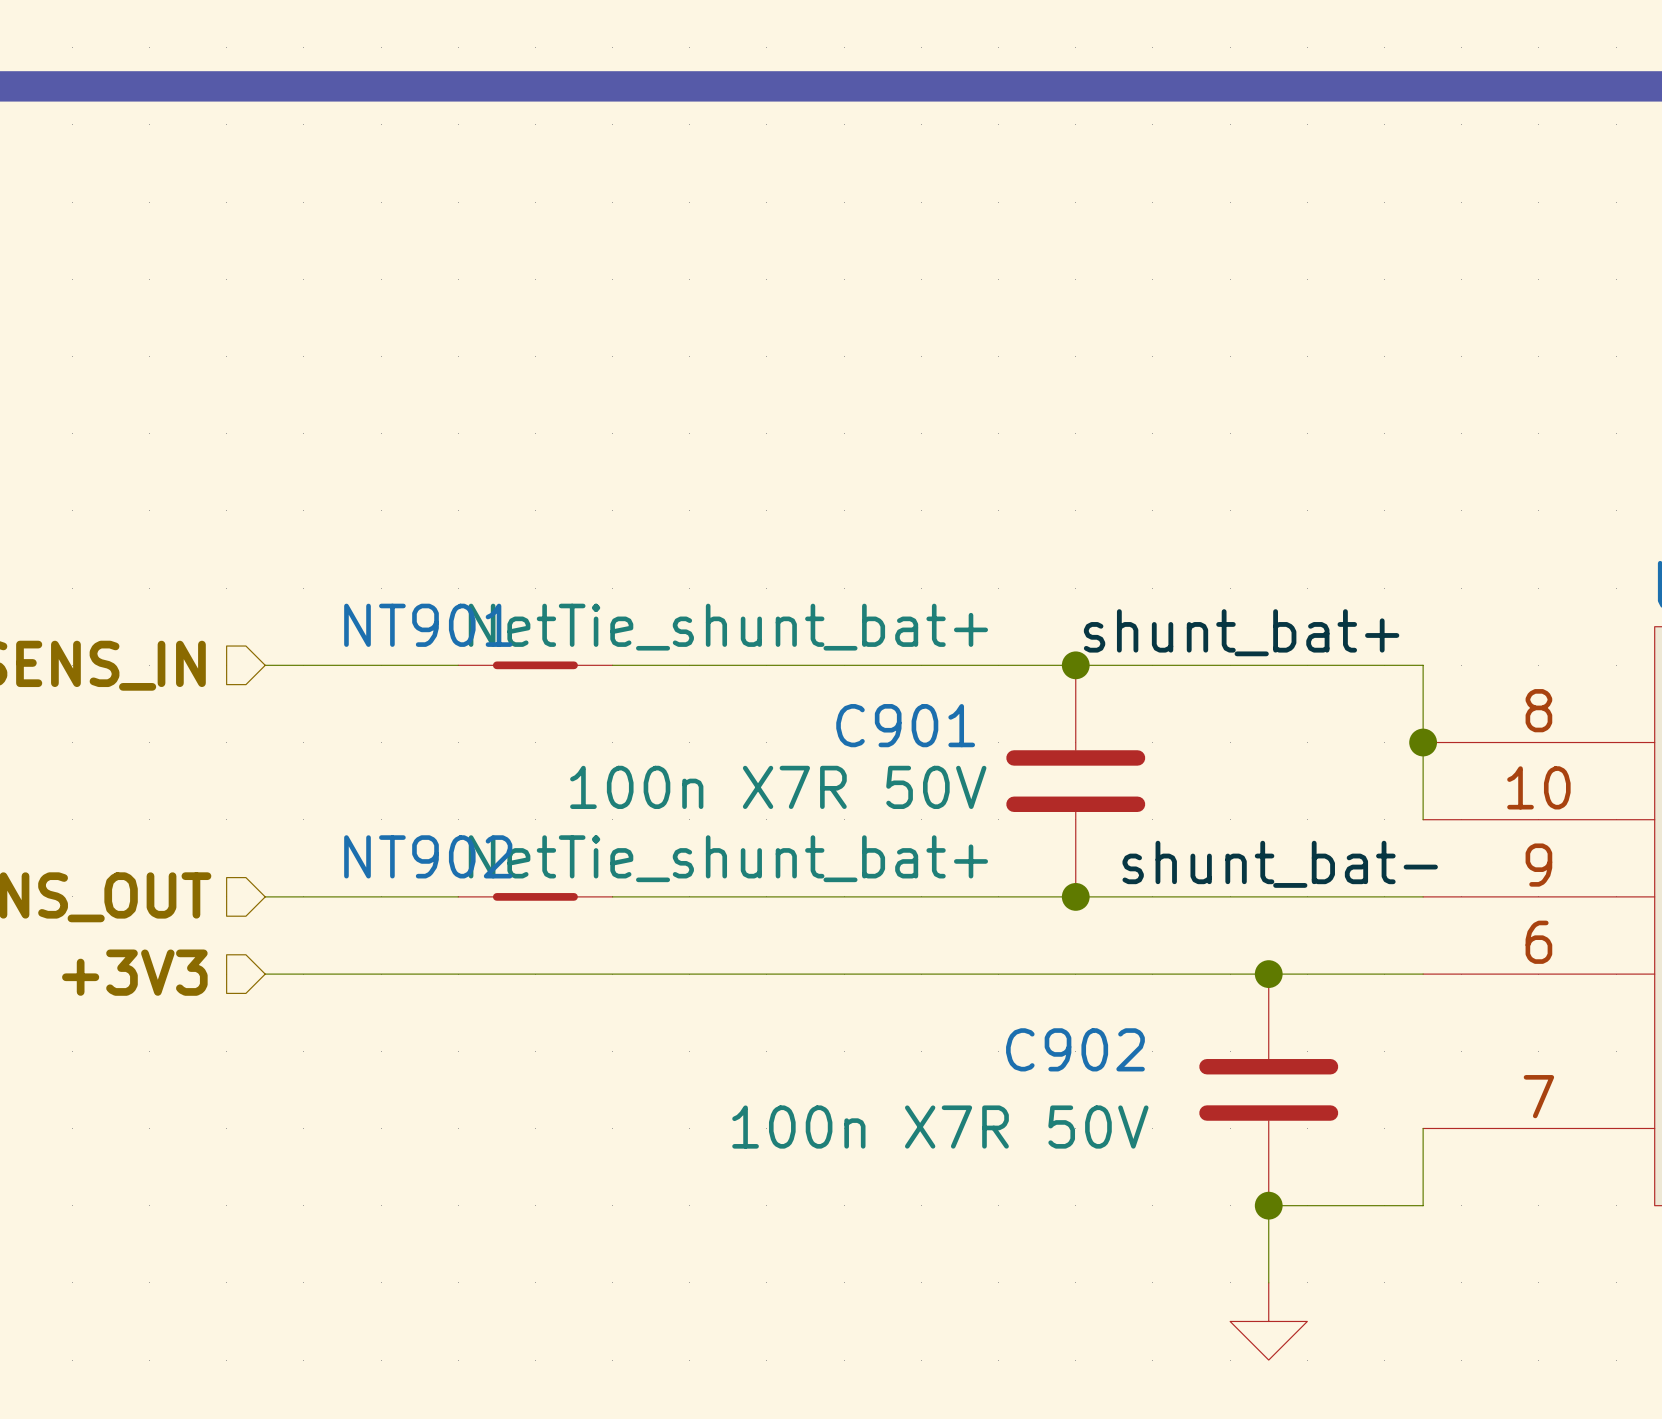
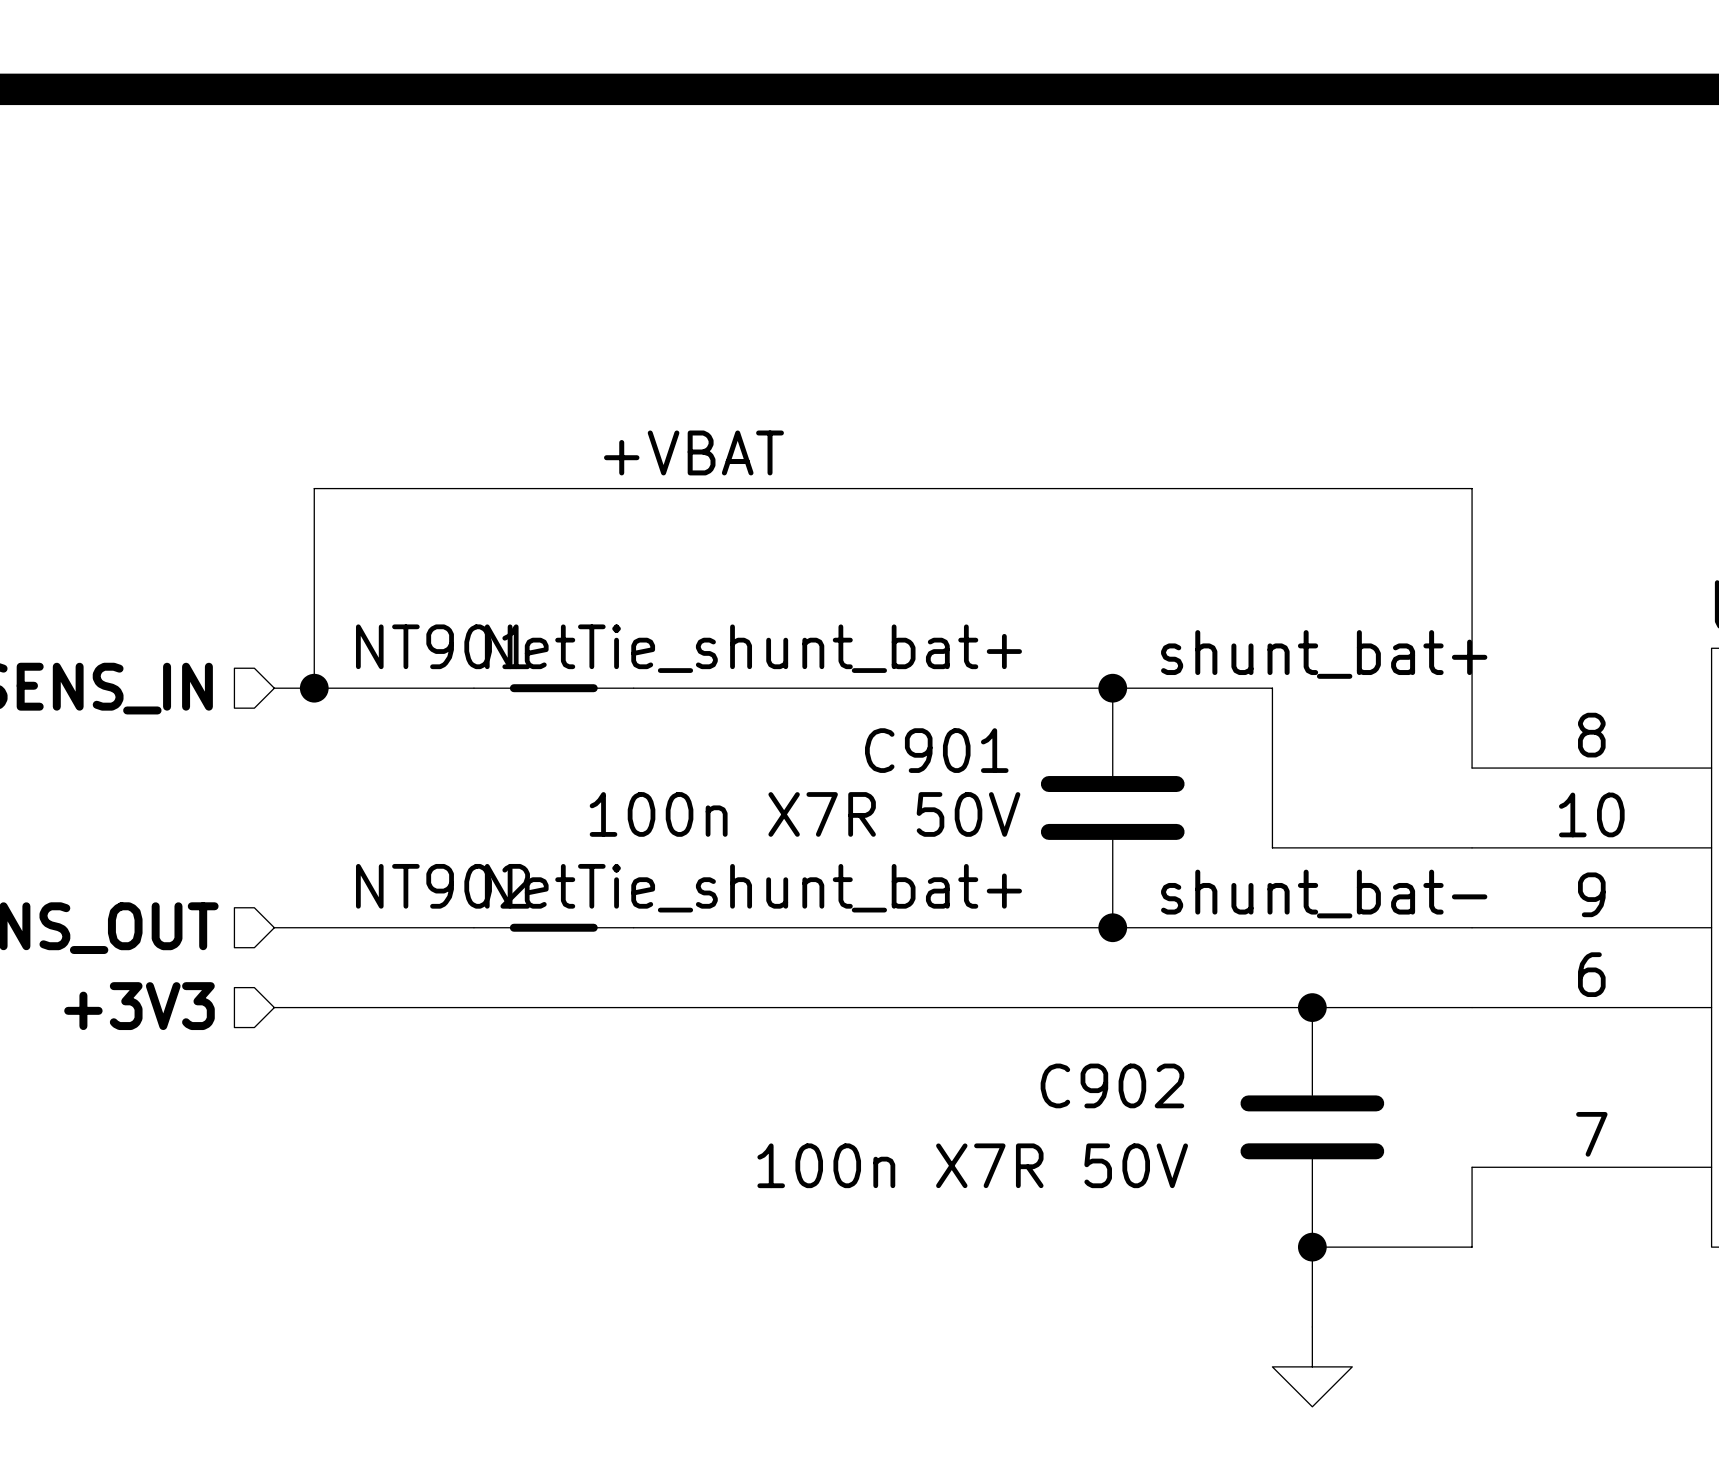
label: none -> +VBAT (693, 452)
label position: shunt_bat+ (1241, 632) -> shunt_bat+ (1324, 654)
wire: none -> (314, 688) (314, 488) (1472, 488) (1472, 688)
junction: none -> (314, 688)
wire: (1230, 665) (1423, 665) -> (1272, 688) (1272, 847) (1472, 847)
wire: (1423, 742) (1423, 819) -> none
junction: (1423, 742) -> none

